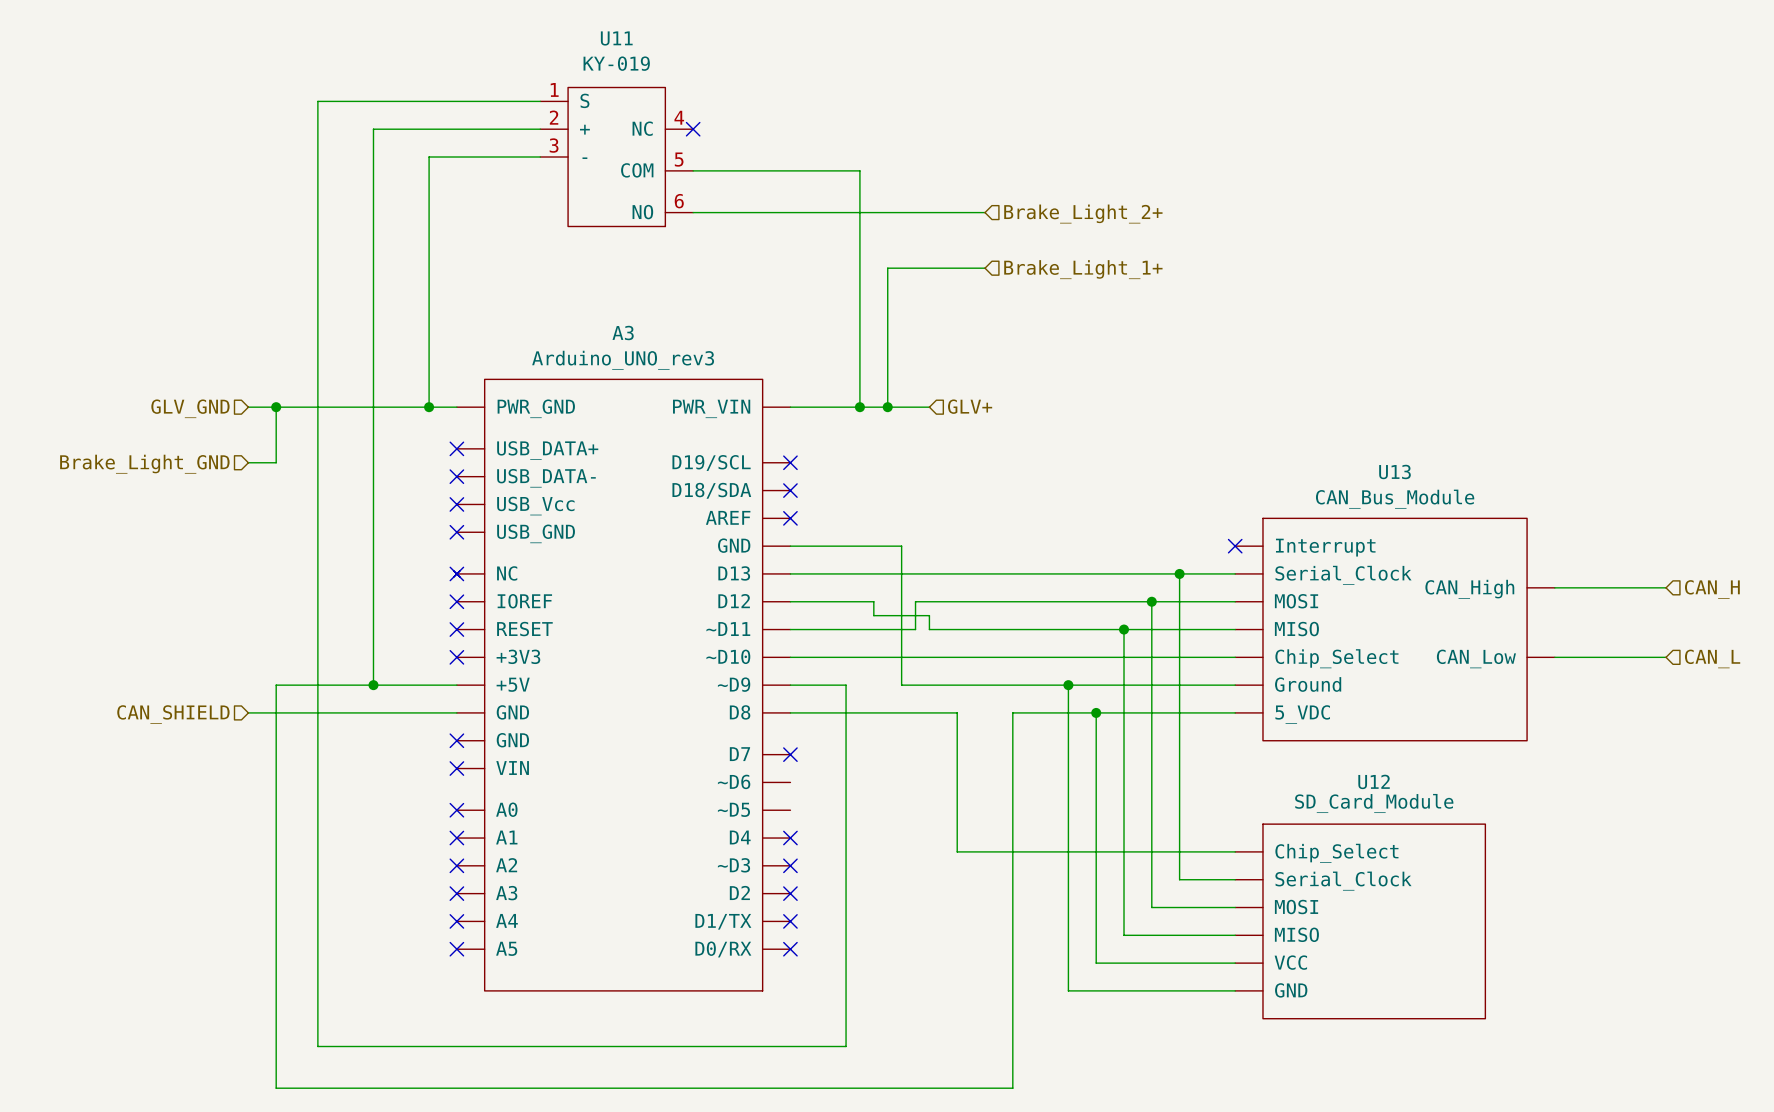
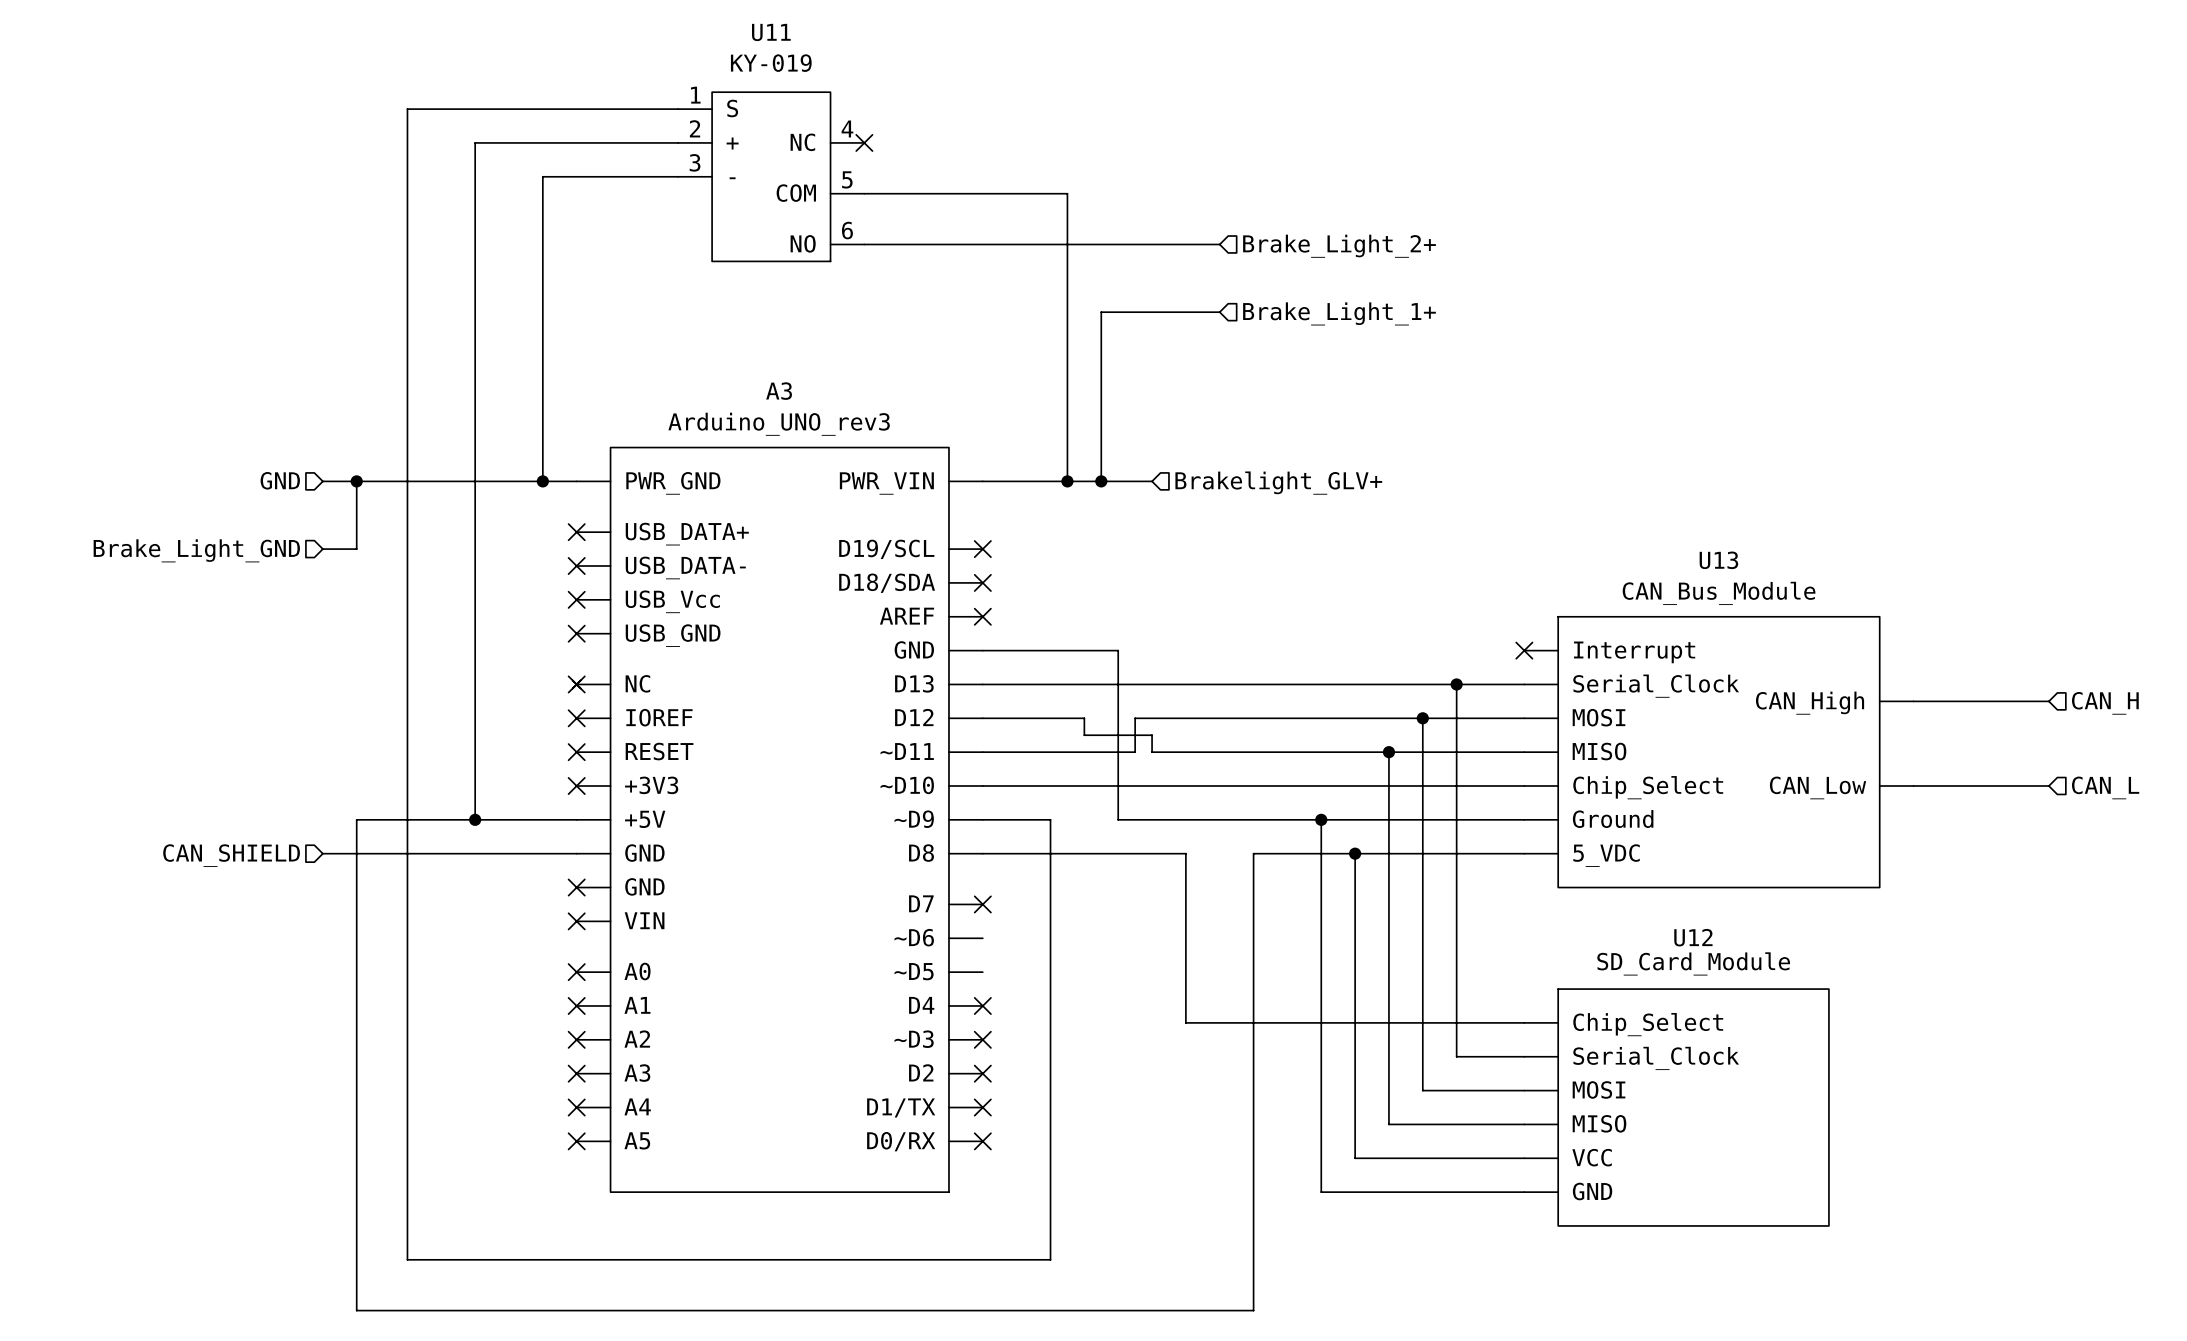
hierarchical label: GLV+ (970, 406) -> Brakelight_GLV+ (1278, 483)
hierarchical label: GLV_GND (190, 408) -> GND (280, 480)

